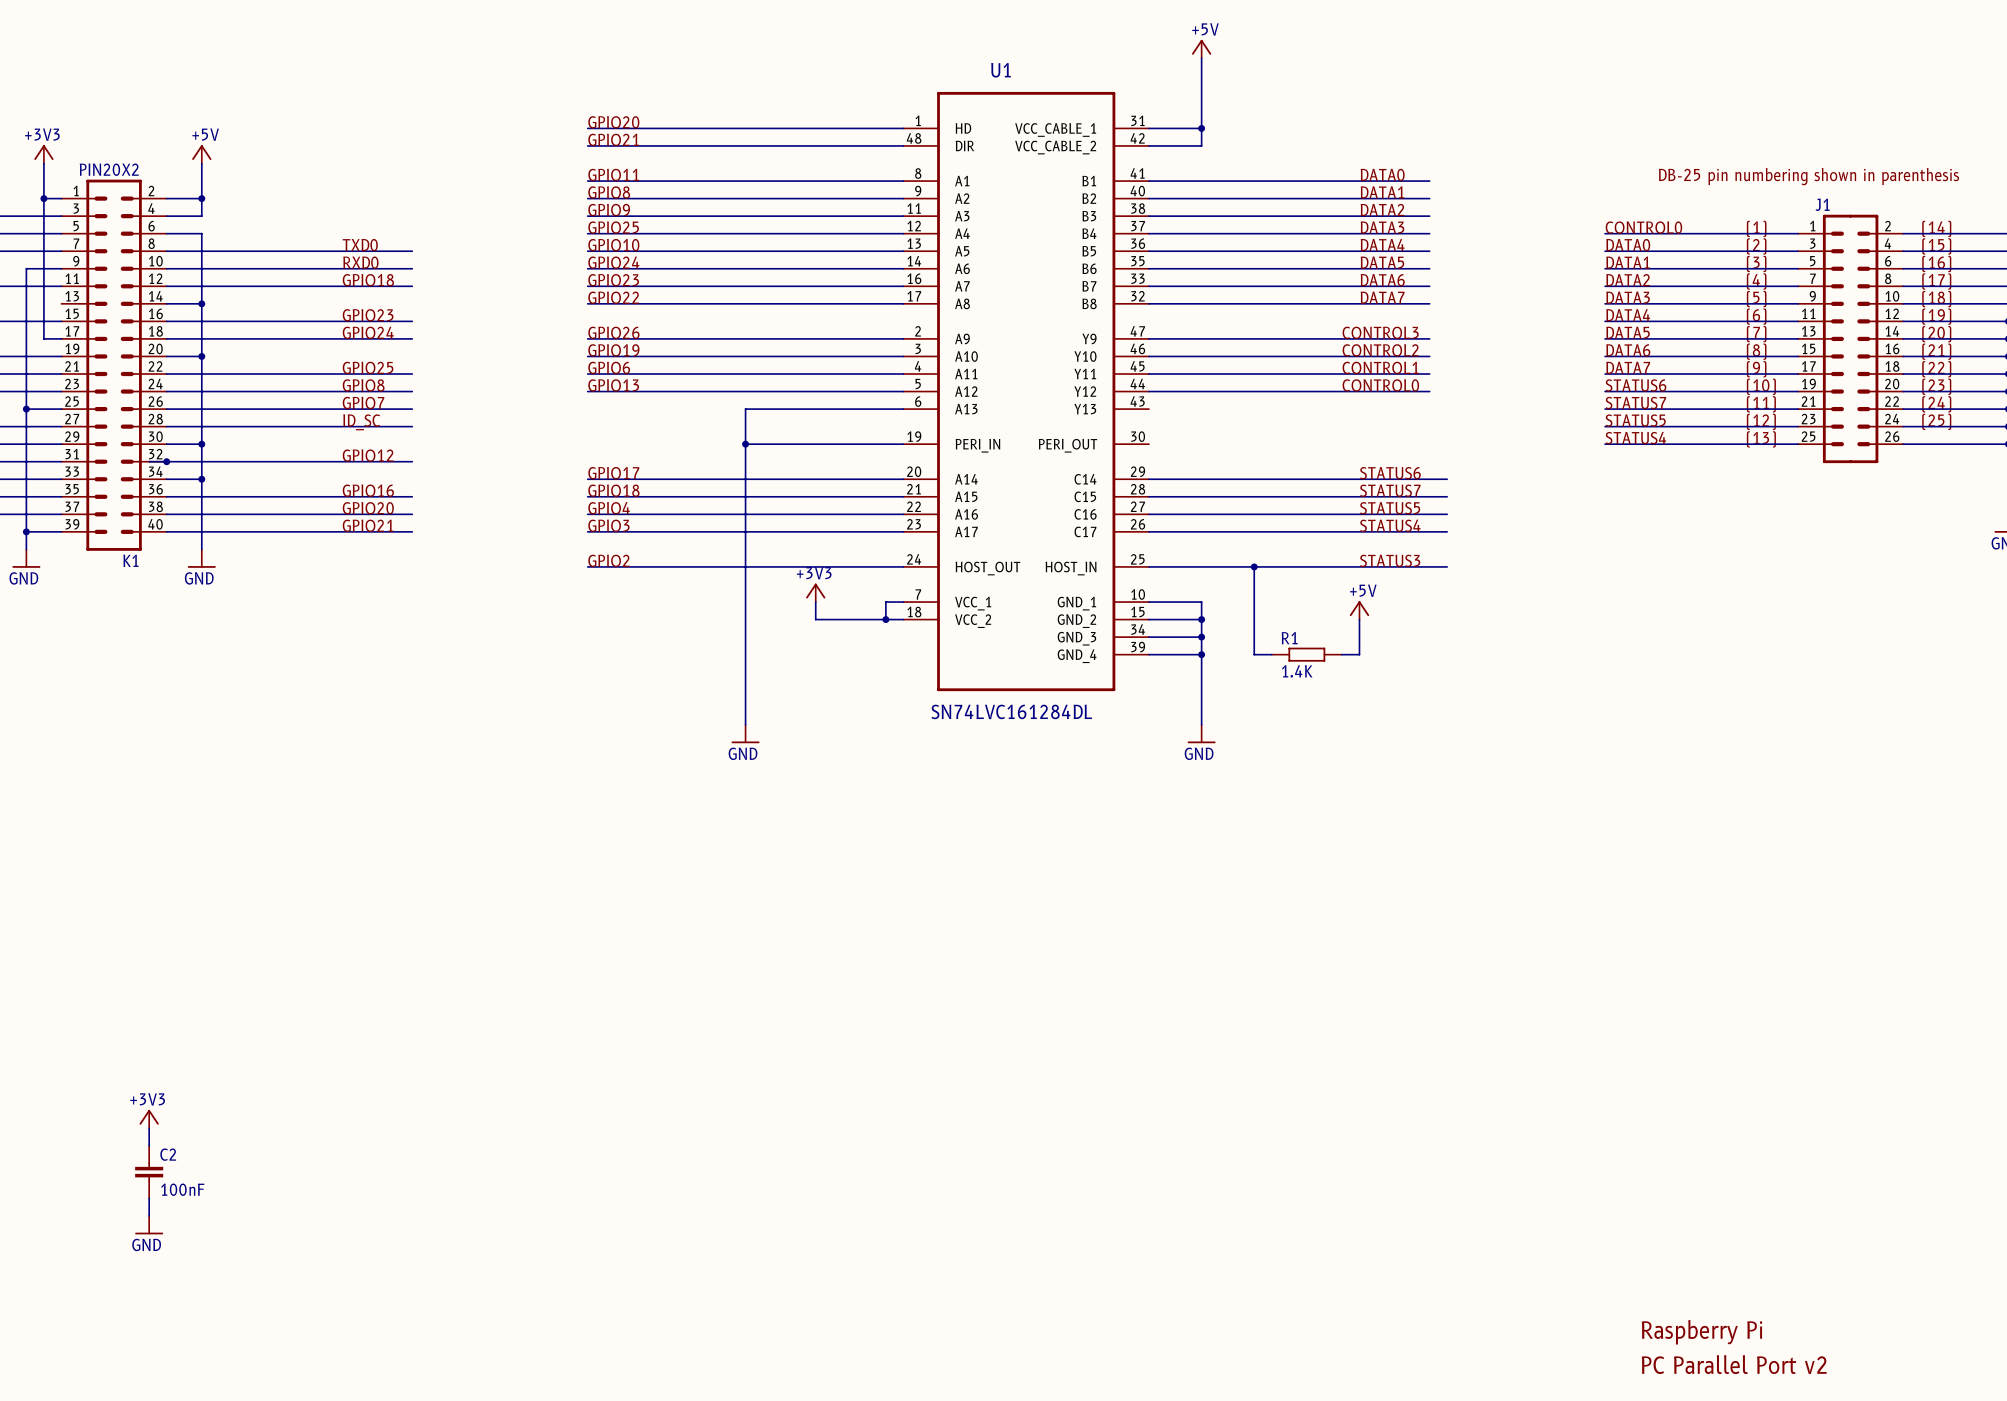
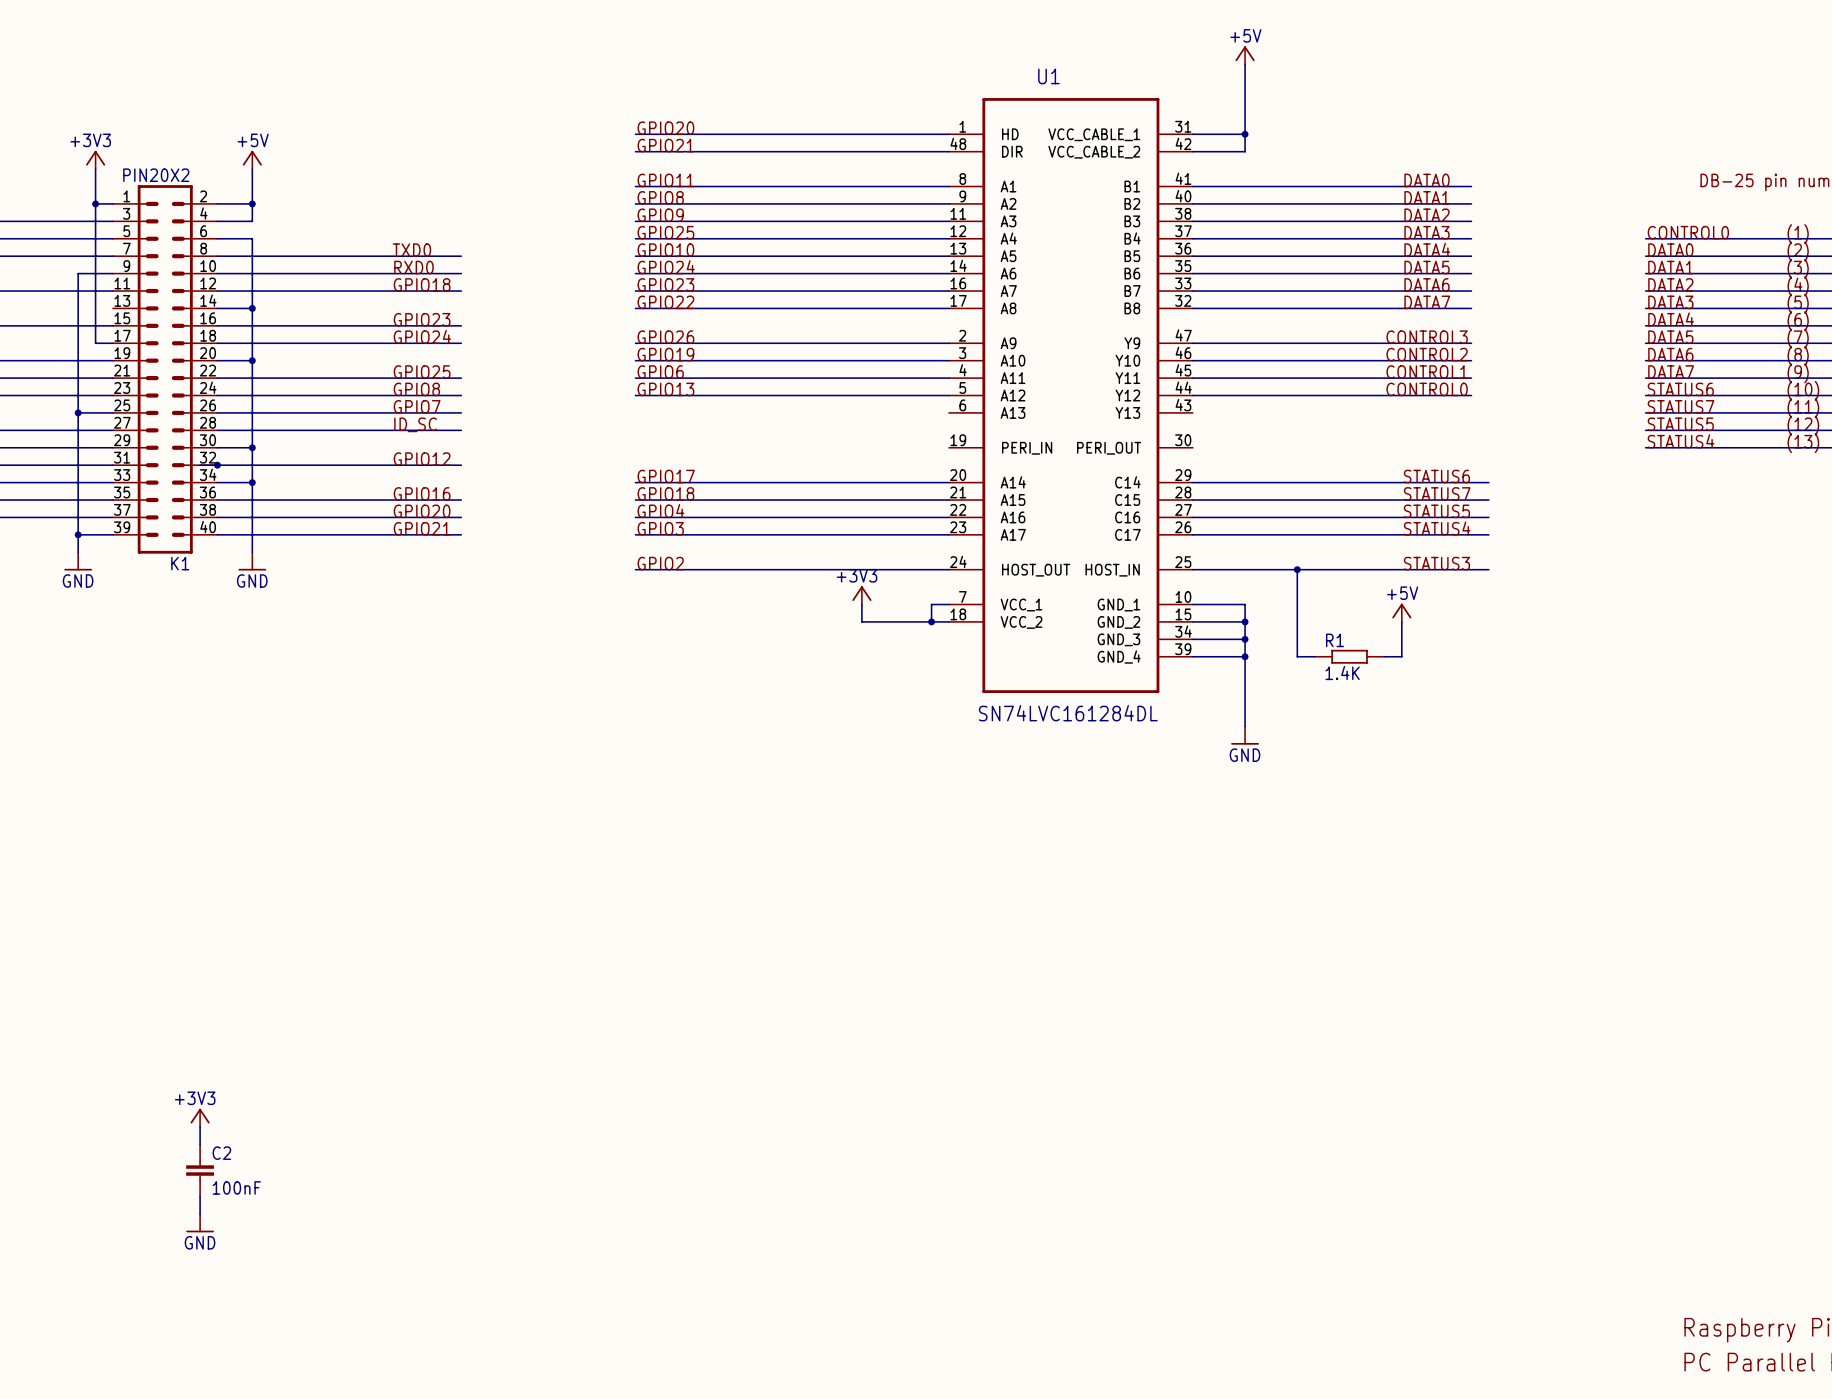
wire: (903, 409) (745, 409) (745, 724) -> none
wire: (745, 444) (903, 444) -> none
junction: (745, 444) -> none
power symbol: GND (745, 734) -> none

